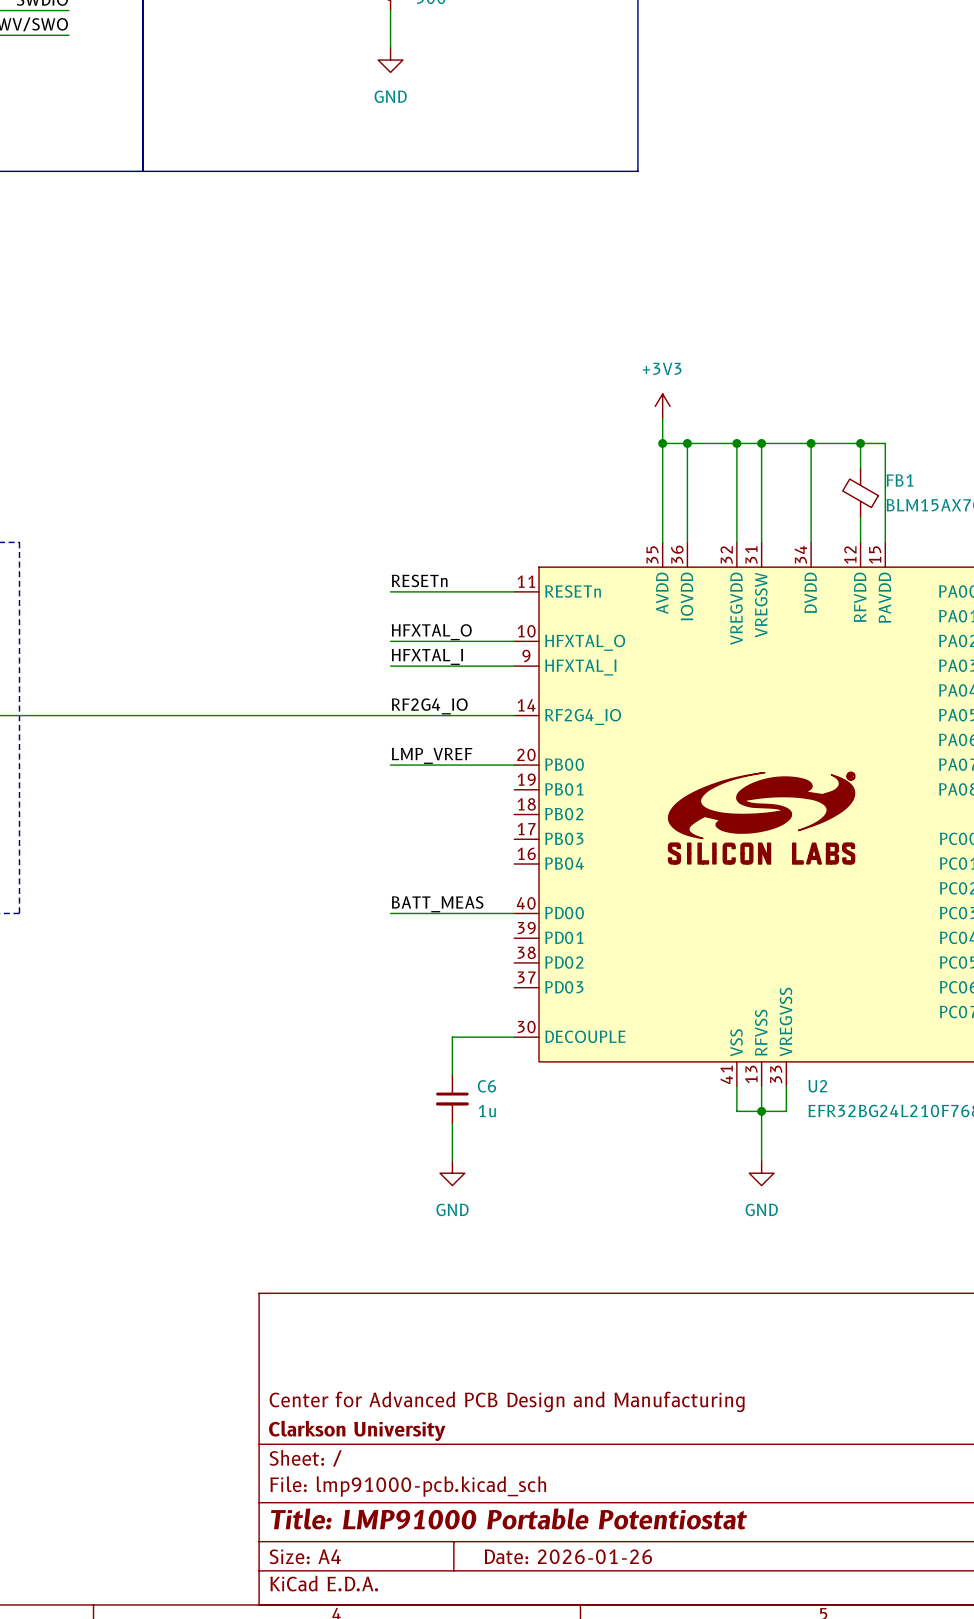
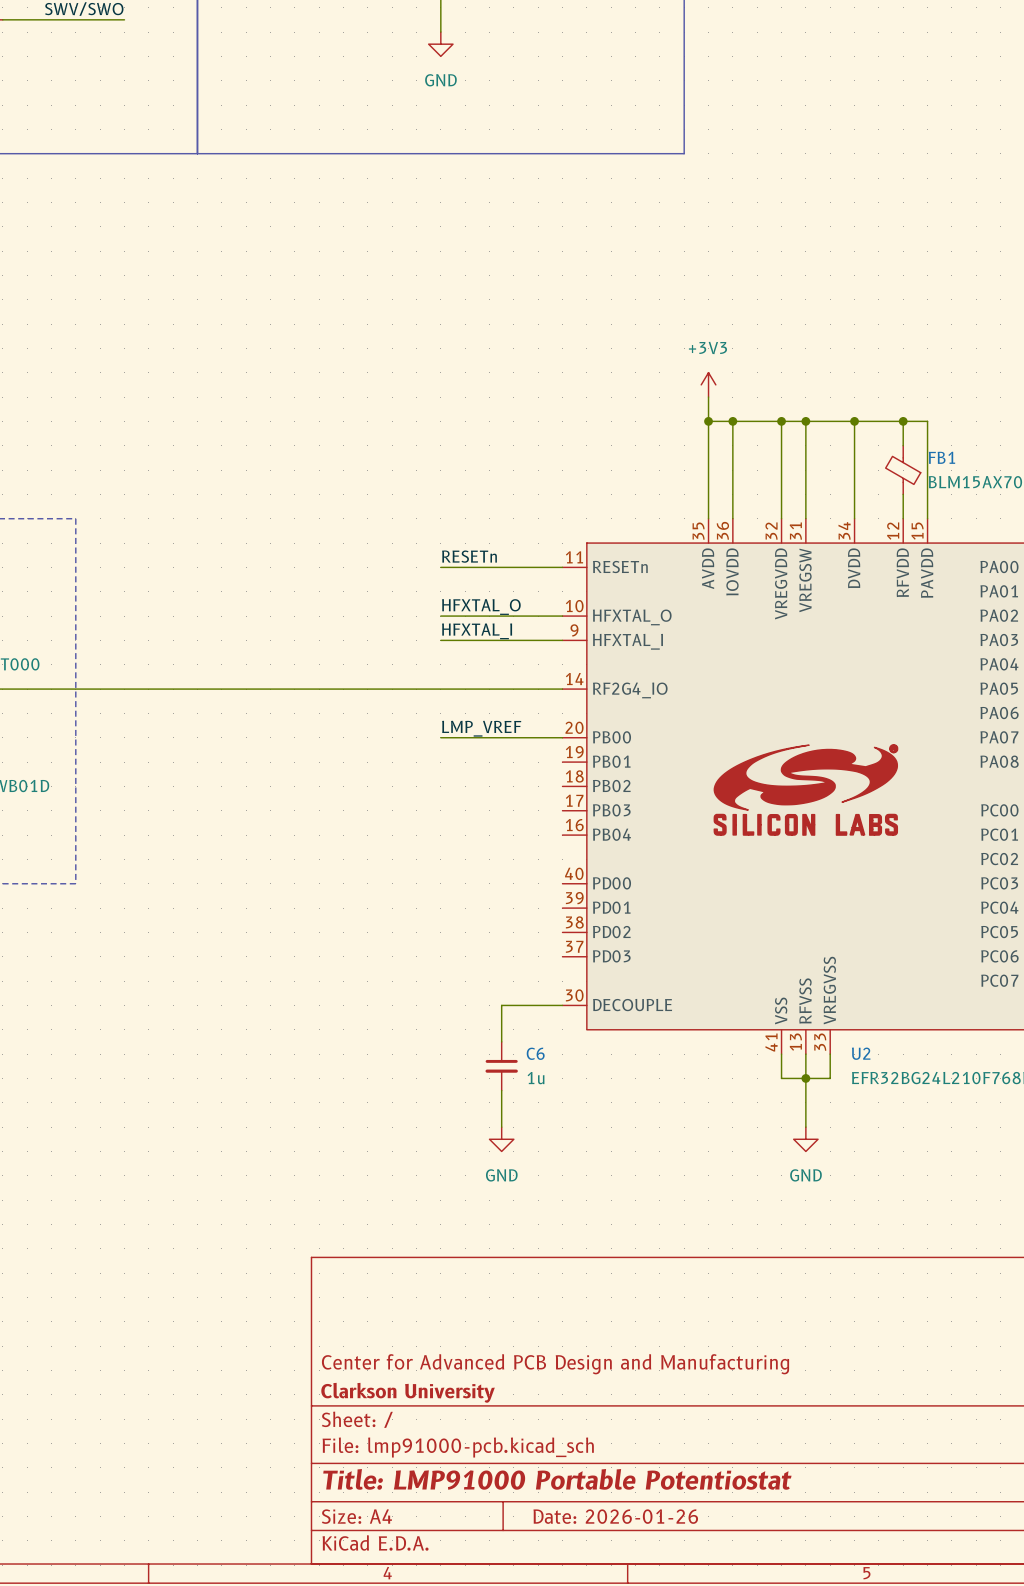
label: RF2G4_IO (429, 706) -> none
label: BATT_MEAS (437, 904) -> none
wire: (390, 913) (514, 913) -> none

